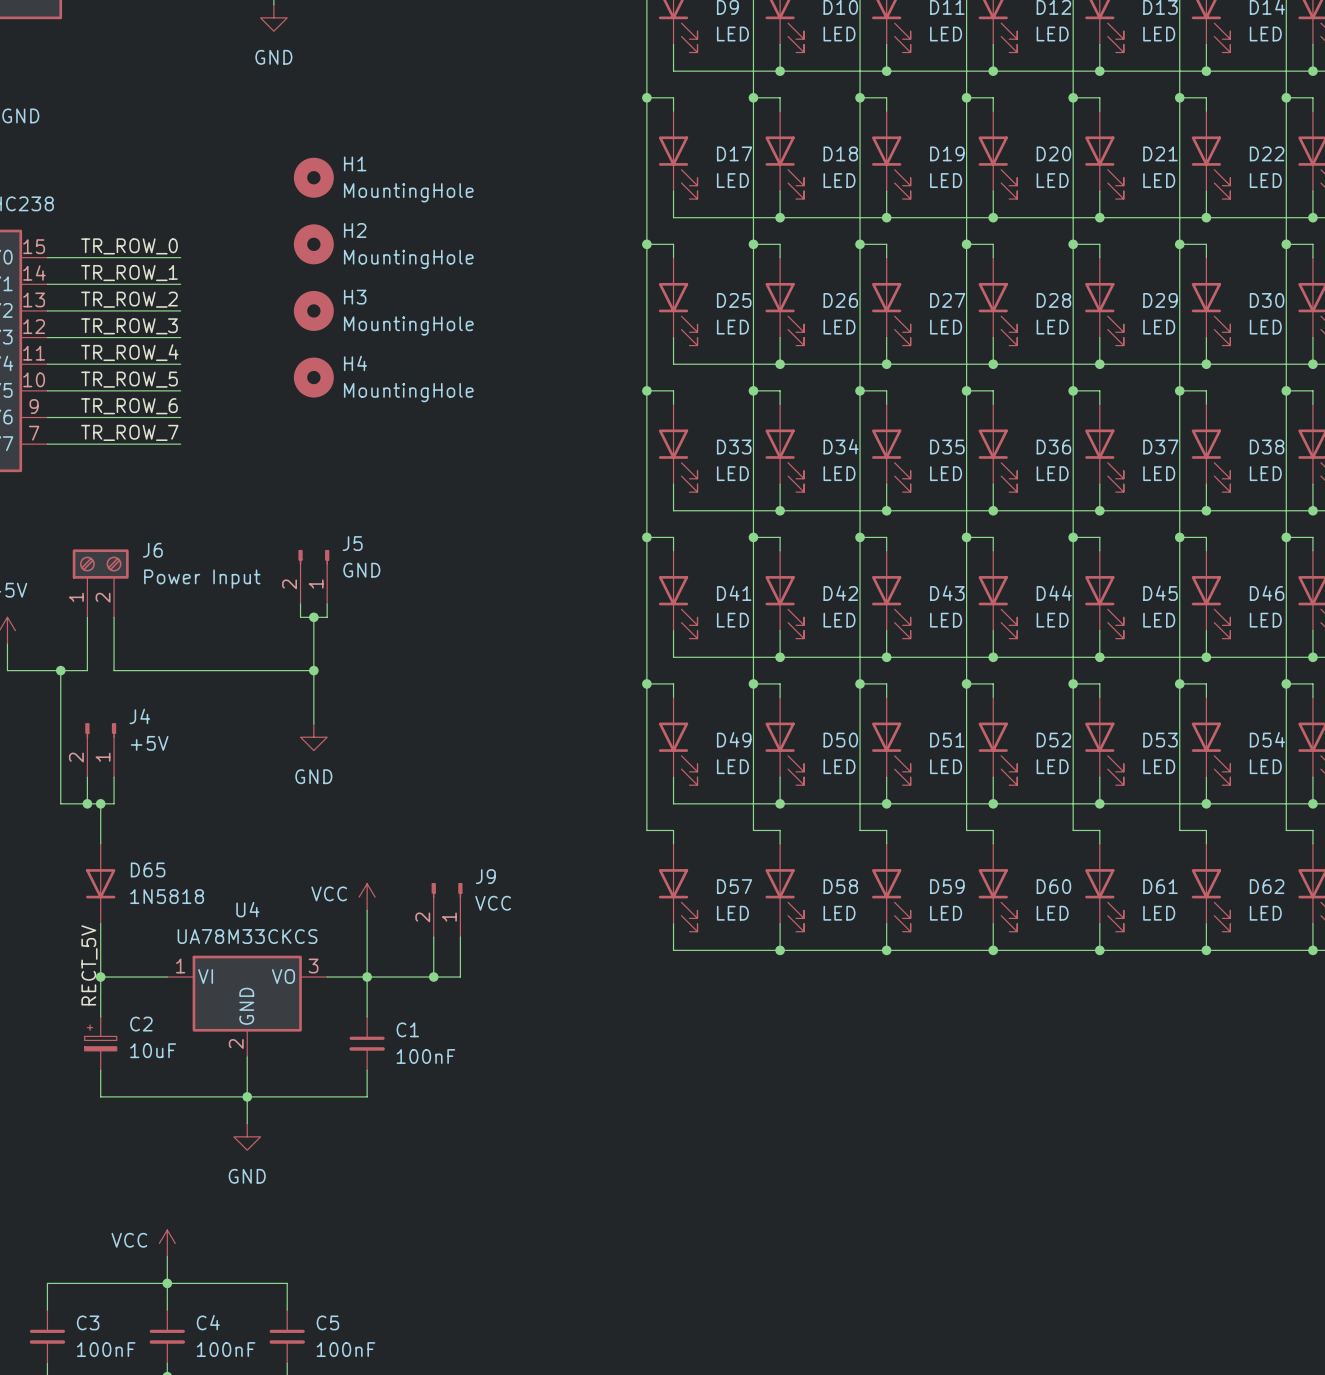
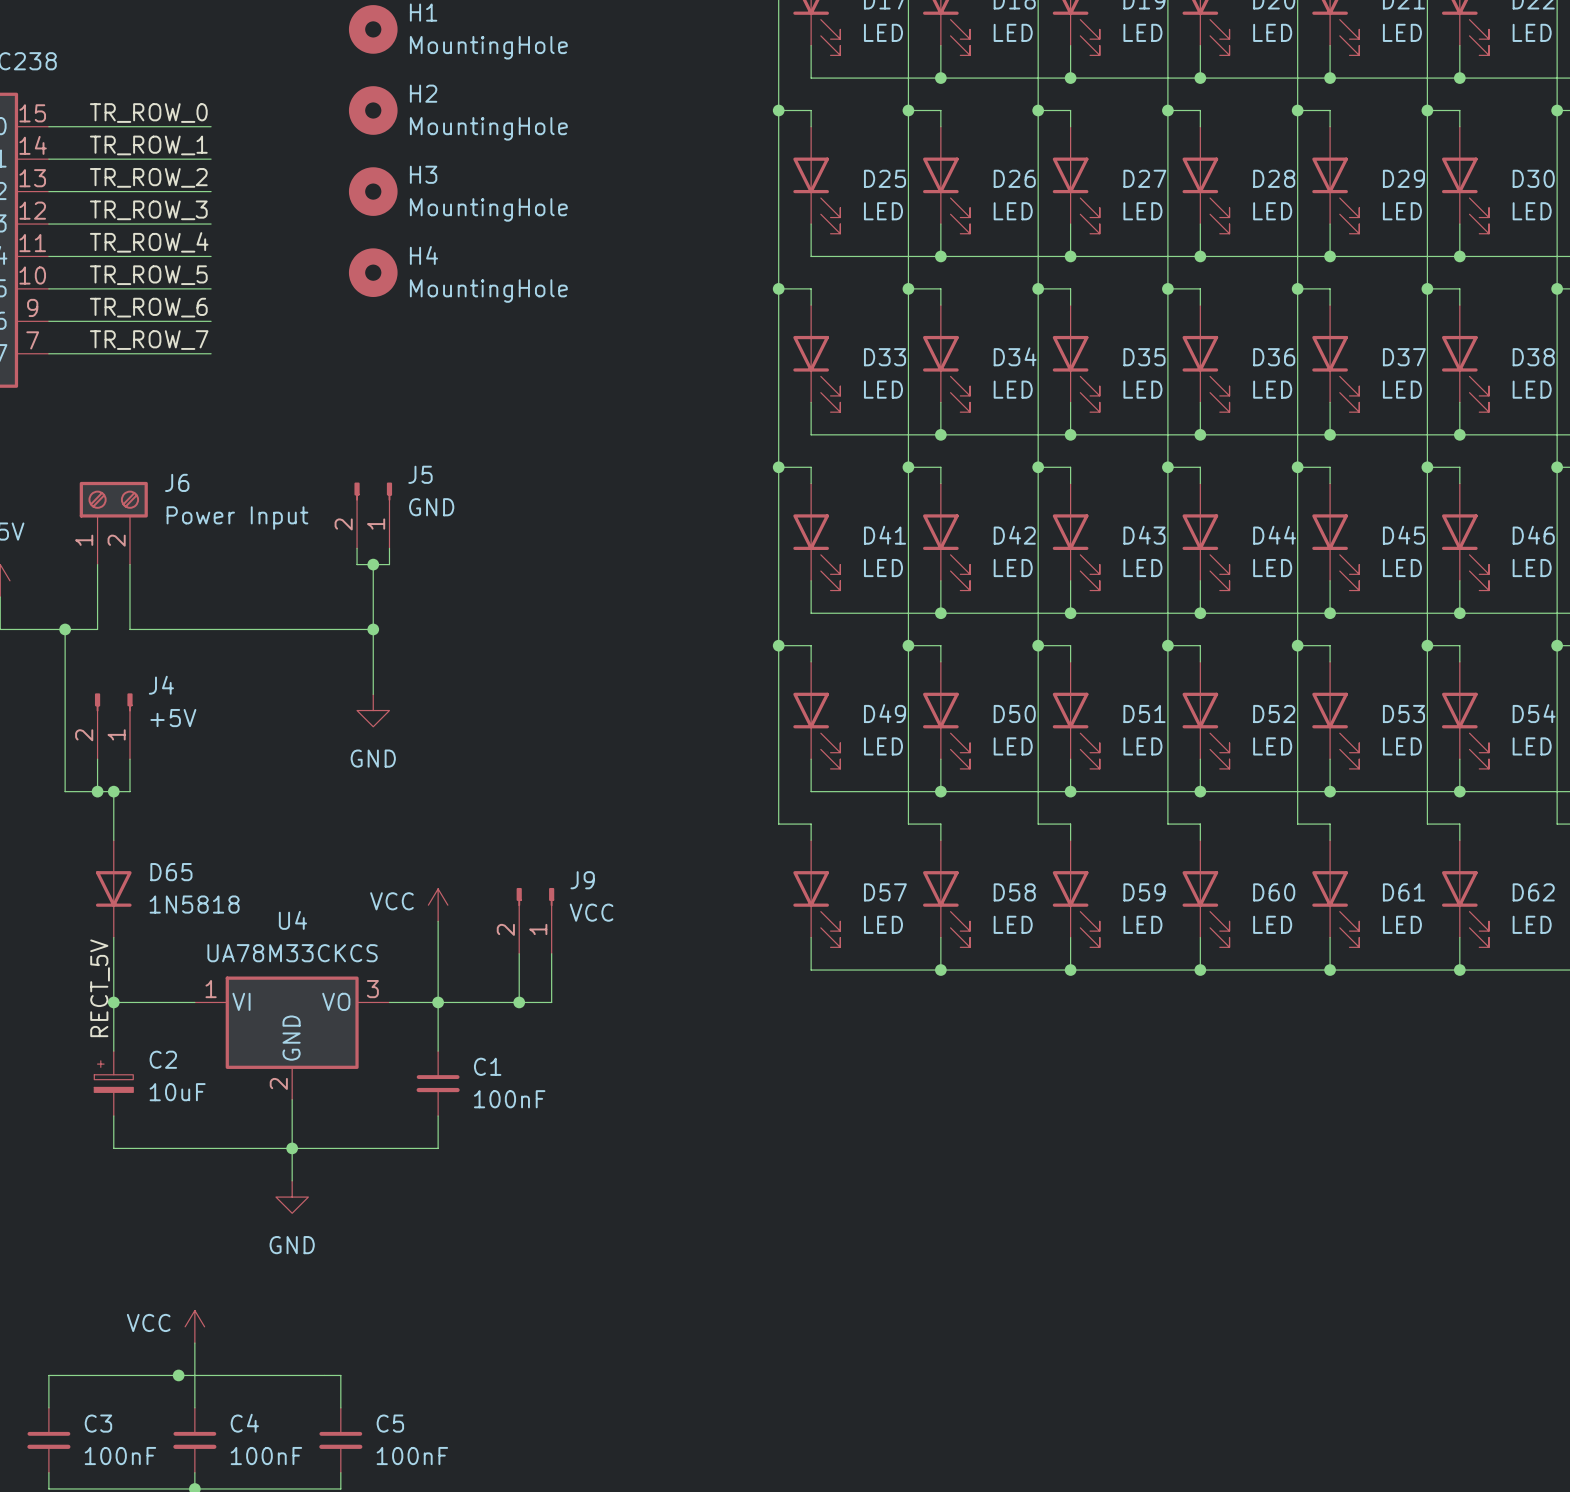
junction position: (167, 1283) -> (178, 1375)

